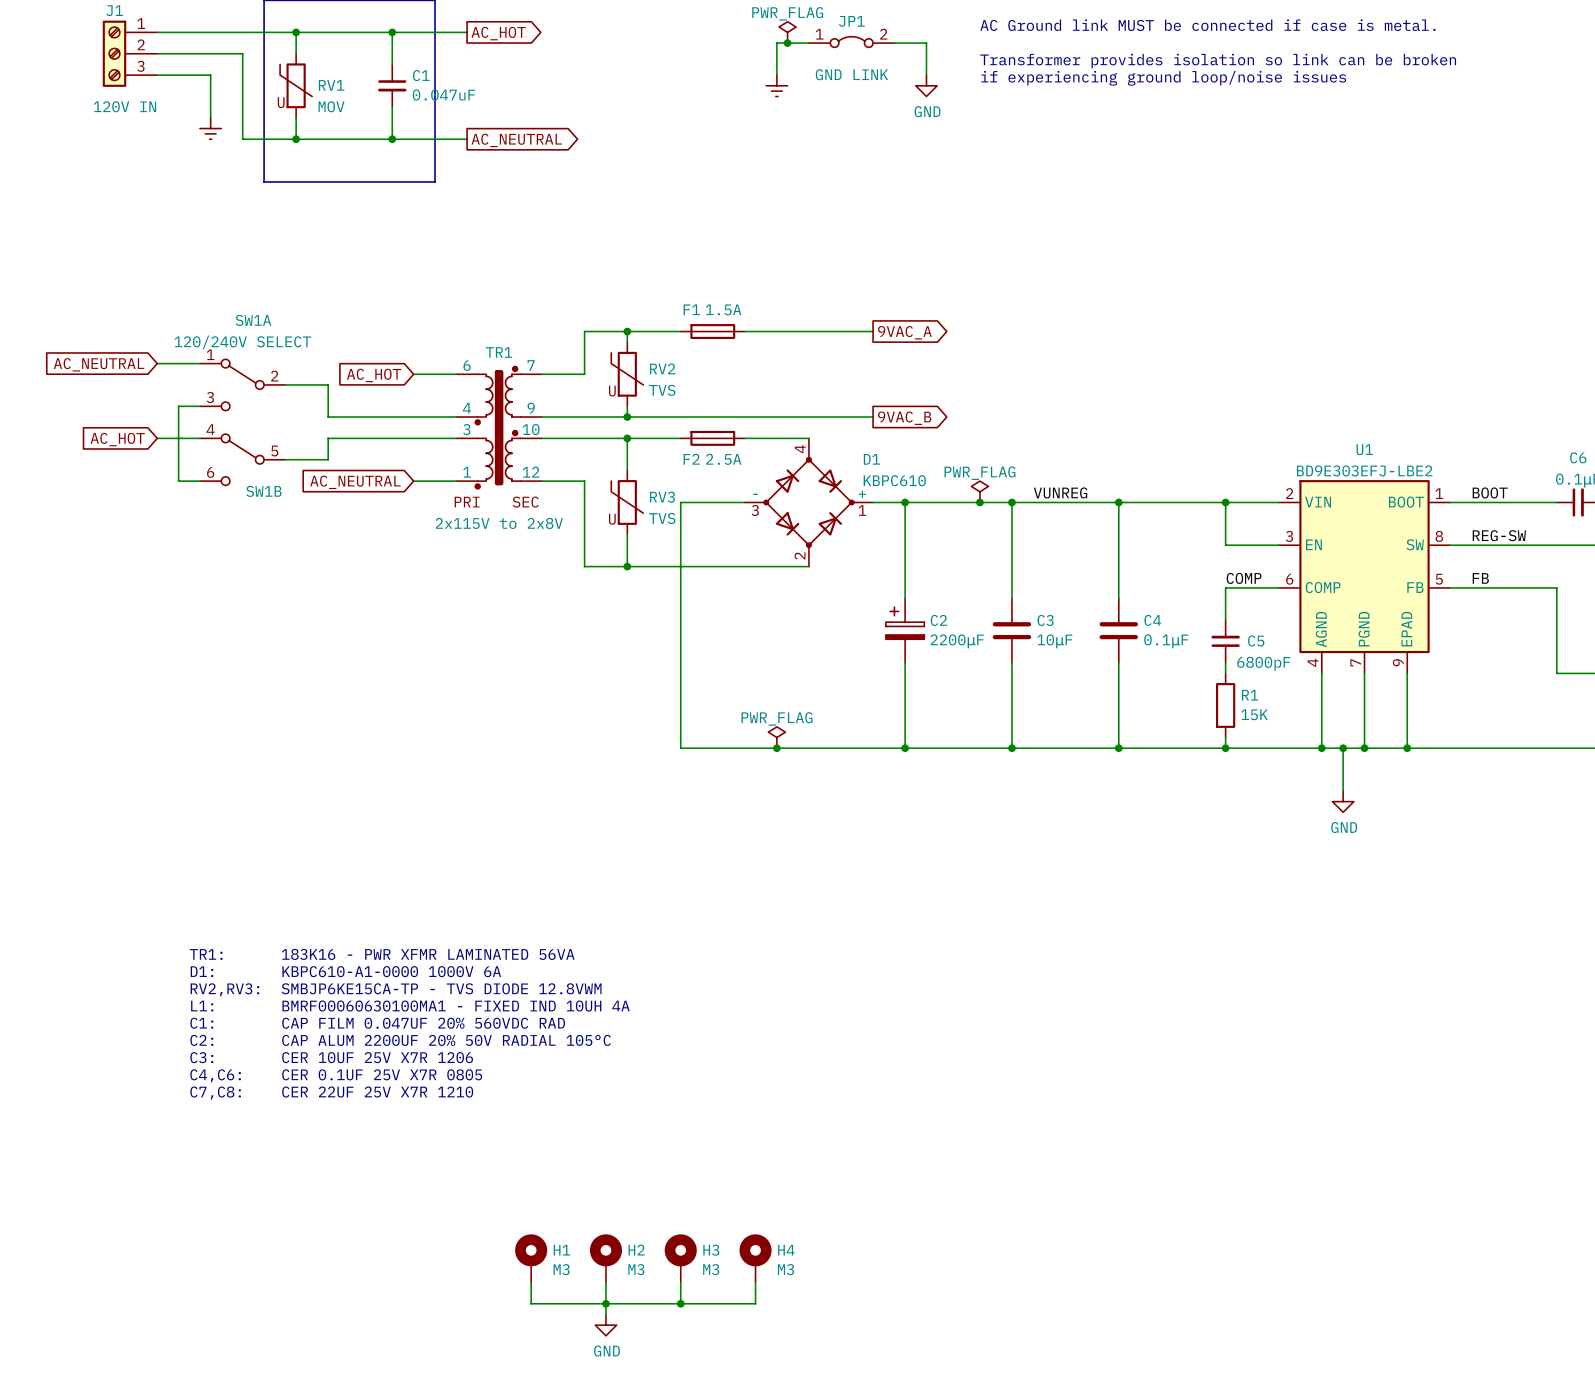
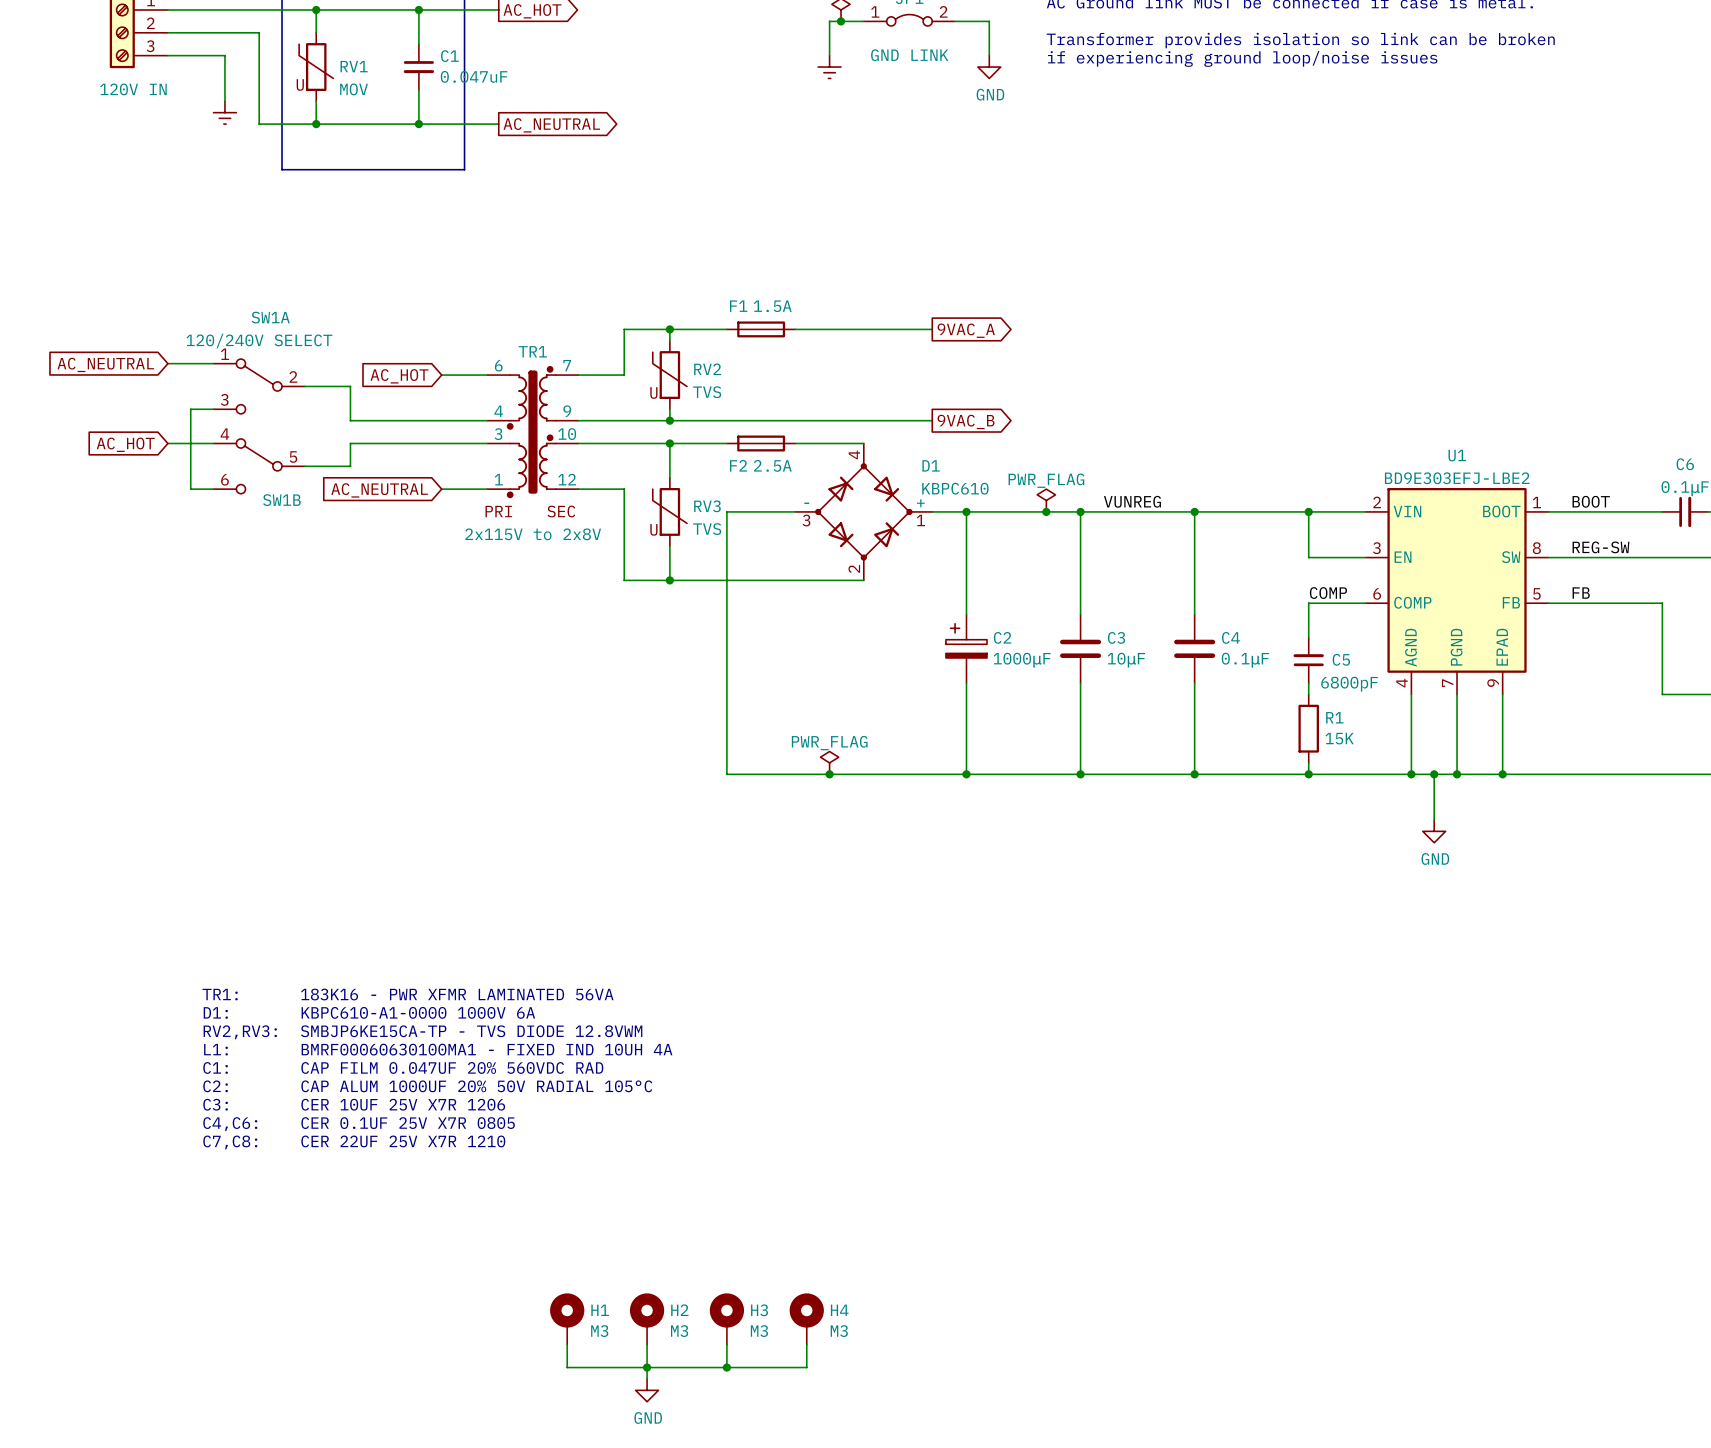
C2 value: 2200μF (957, 641) -> 1000μF (1022, 660)
text: C2: CAP ALUM 2200UF 20% 50V RADIAL 105°C (400, 1040) -> C2: CAP ALUM 1000UF 20% 50V RADIAL 105°C (427, 1086)

